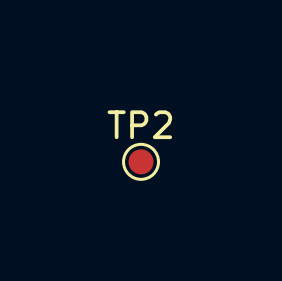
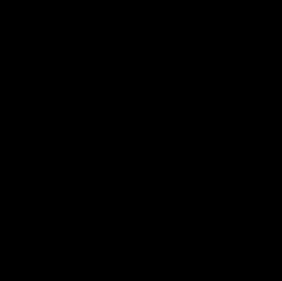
TP2: (141, 161) -> none

